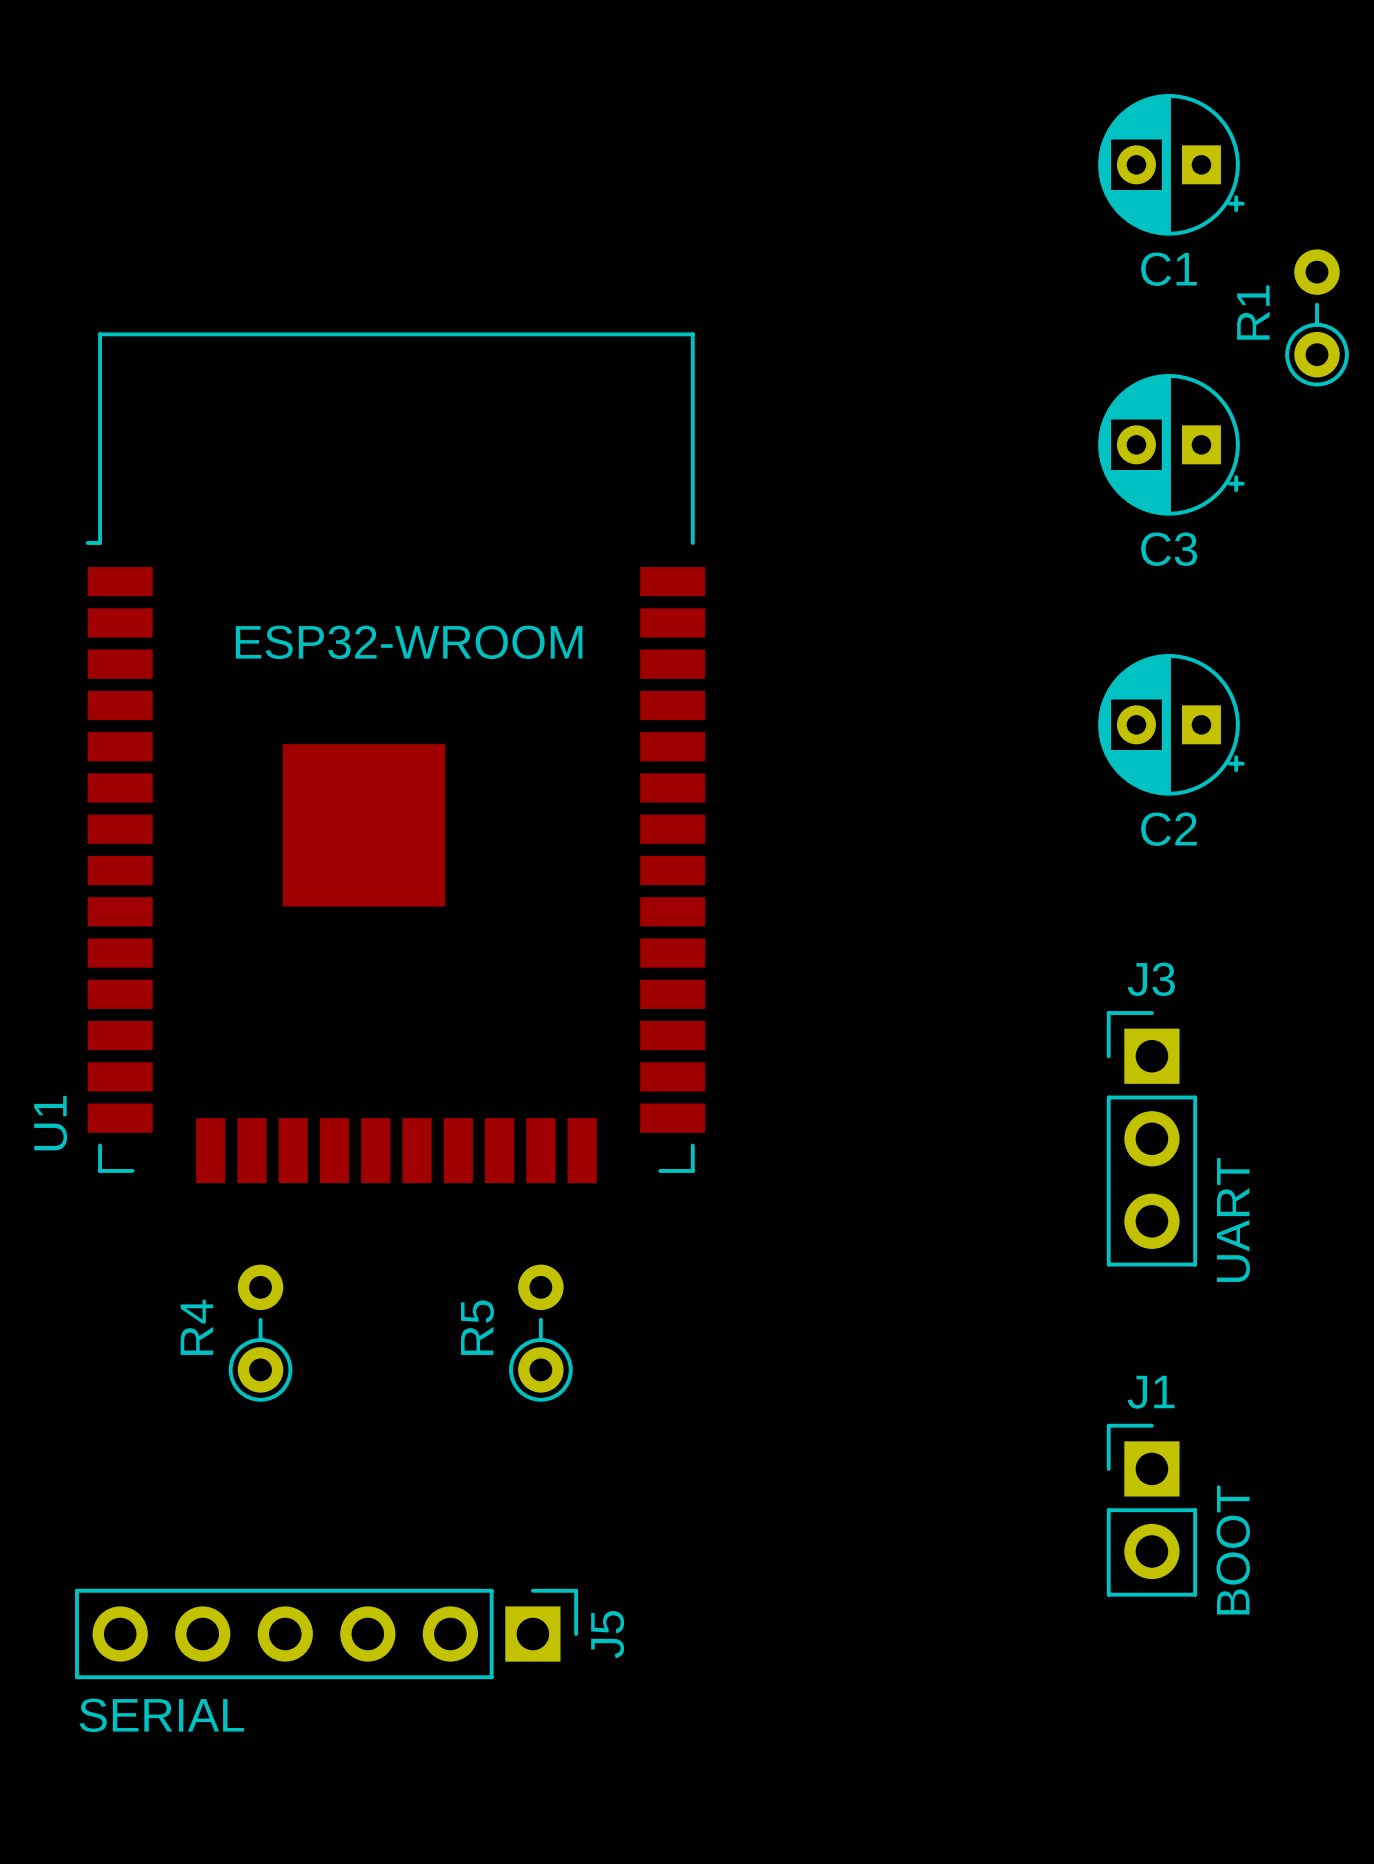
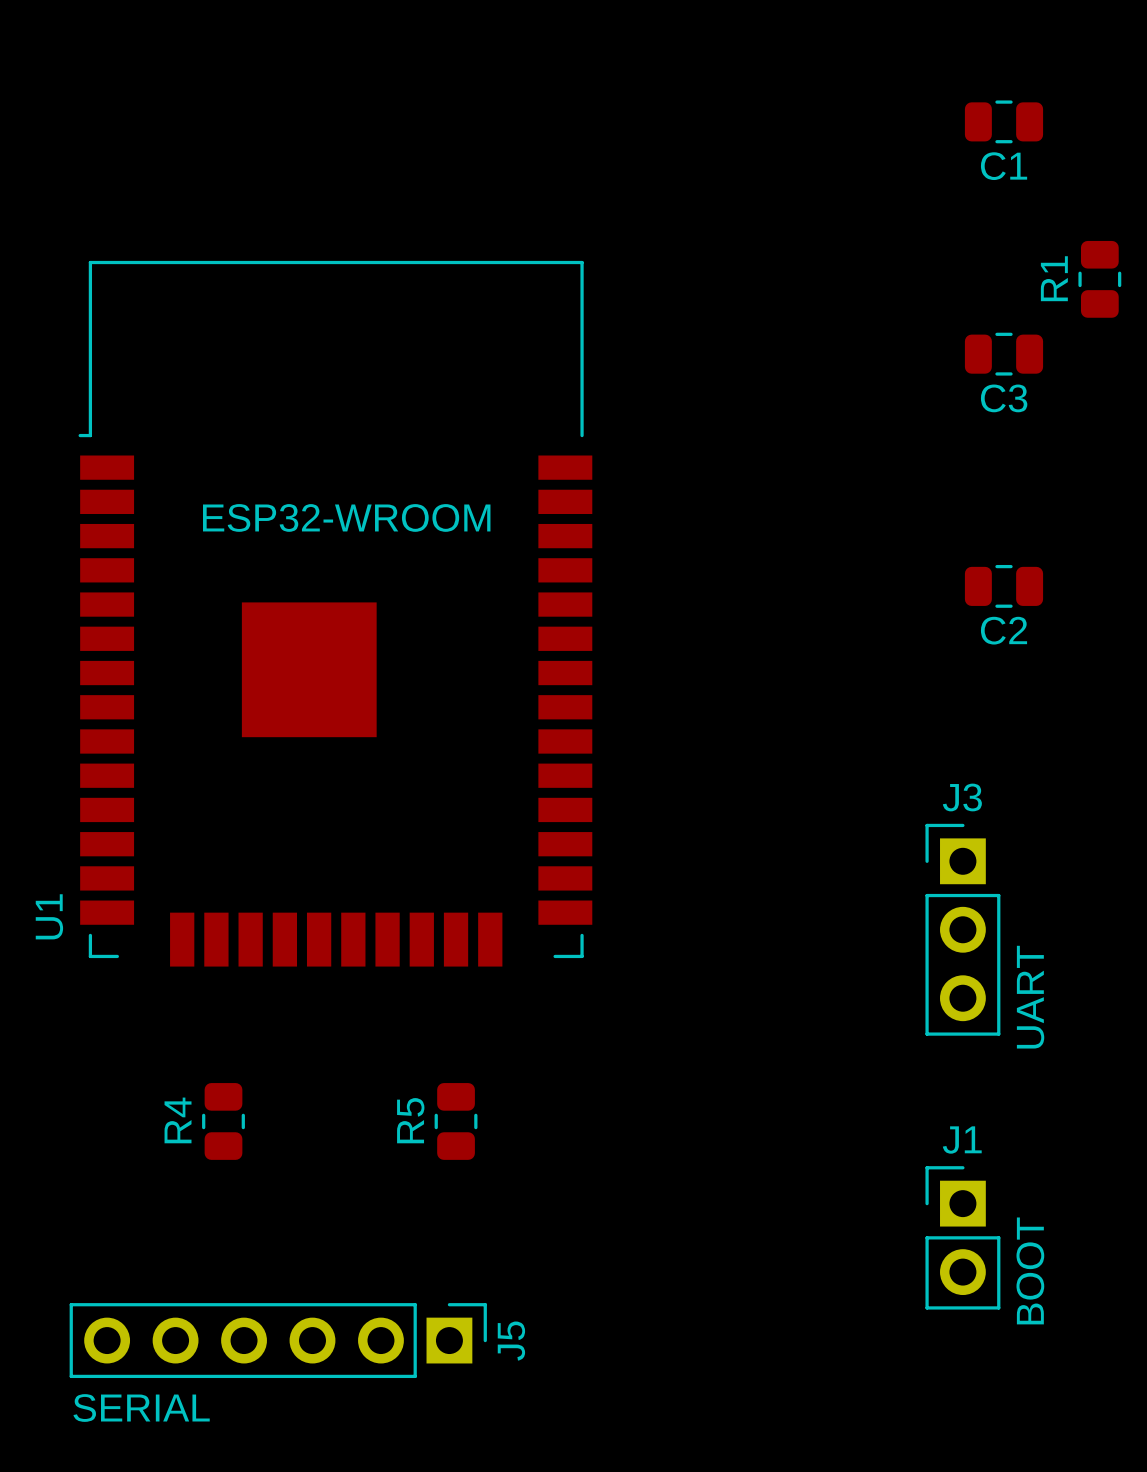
C1 footprint: [1098, 93, 1245, 236] -> [964, 100, 1044, 144]
R1 footprint: [1285, 249, 1349, 387] -> [1078, 240, 1122, 318]
C3 footprint: [1098, 373, 1245, 516] -> [964, 332, 1044, 376]
C2 footprint: [1098, 653, 1245, 796] -> [964, 564, 1044, 608]
R4 footprint: [228, 1264, 293, 1402] -> [202, 1083, 245, 1160]
R5 footprint: [509, 1264, 573, 1402] -> [434, 1083, 478, 1160]

